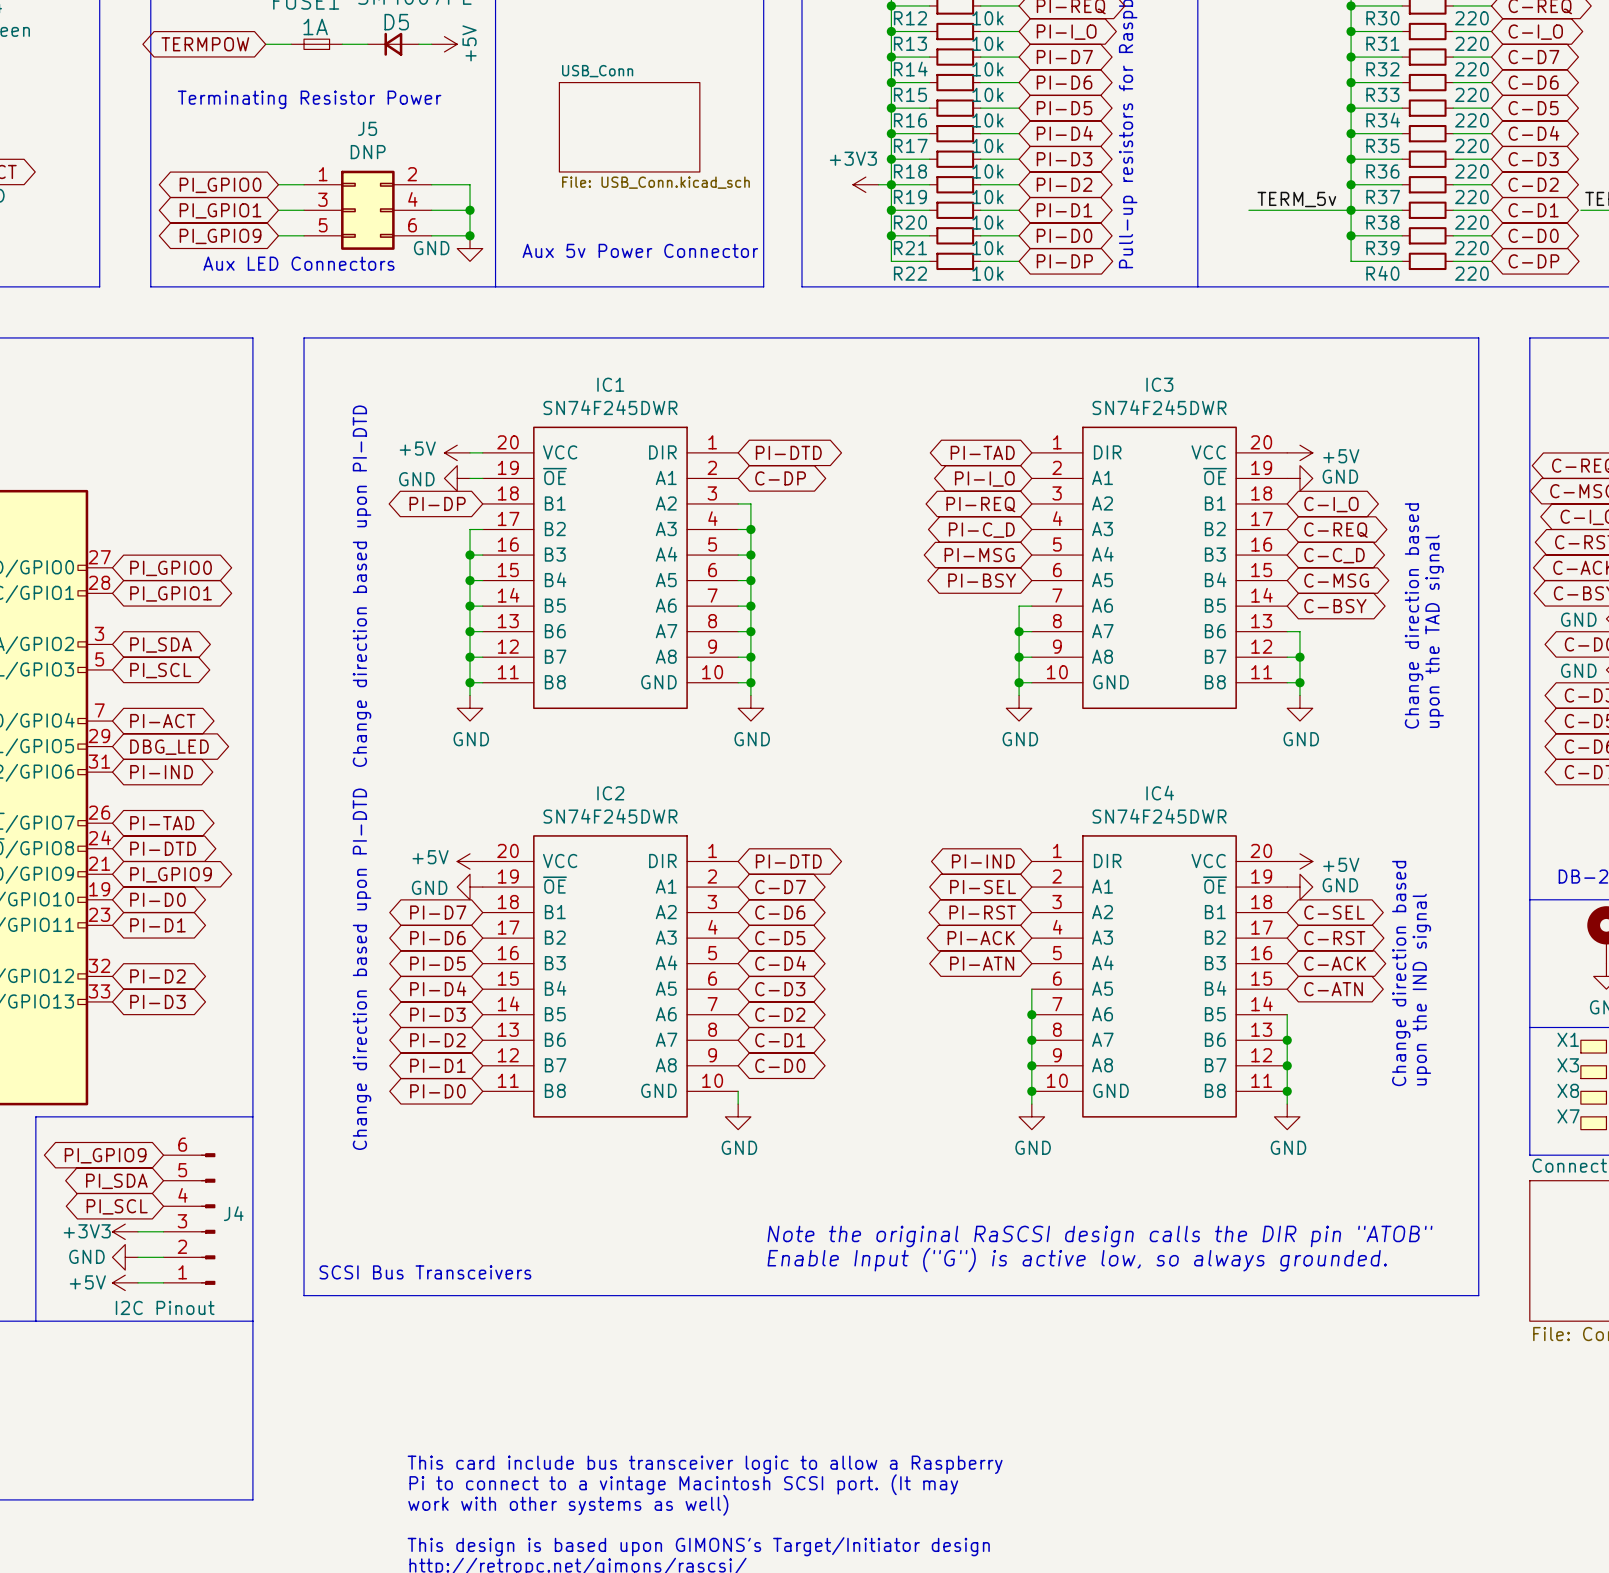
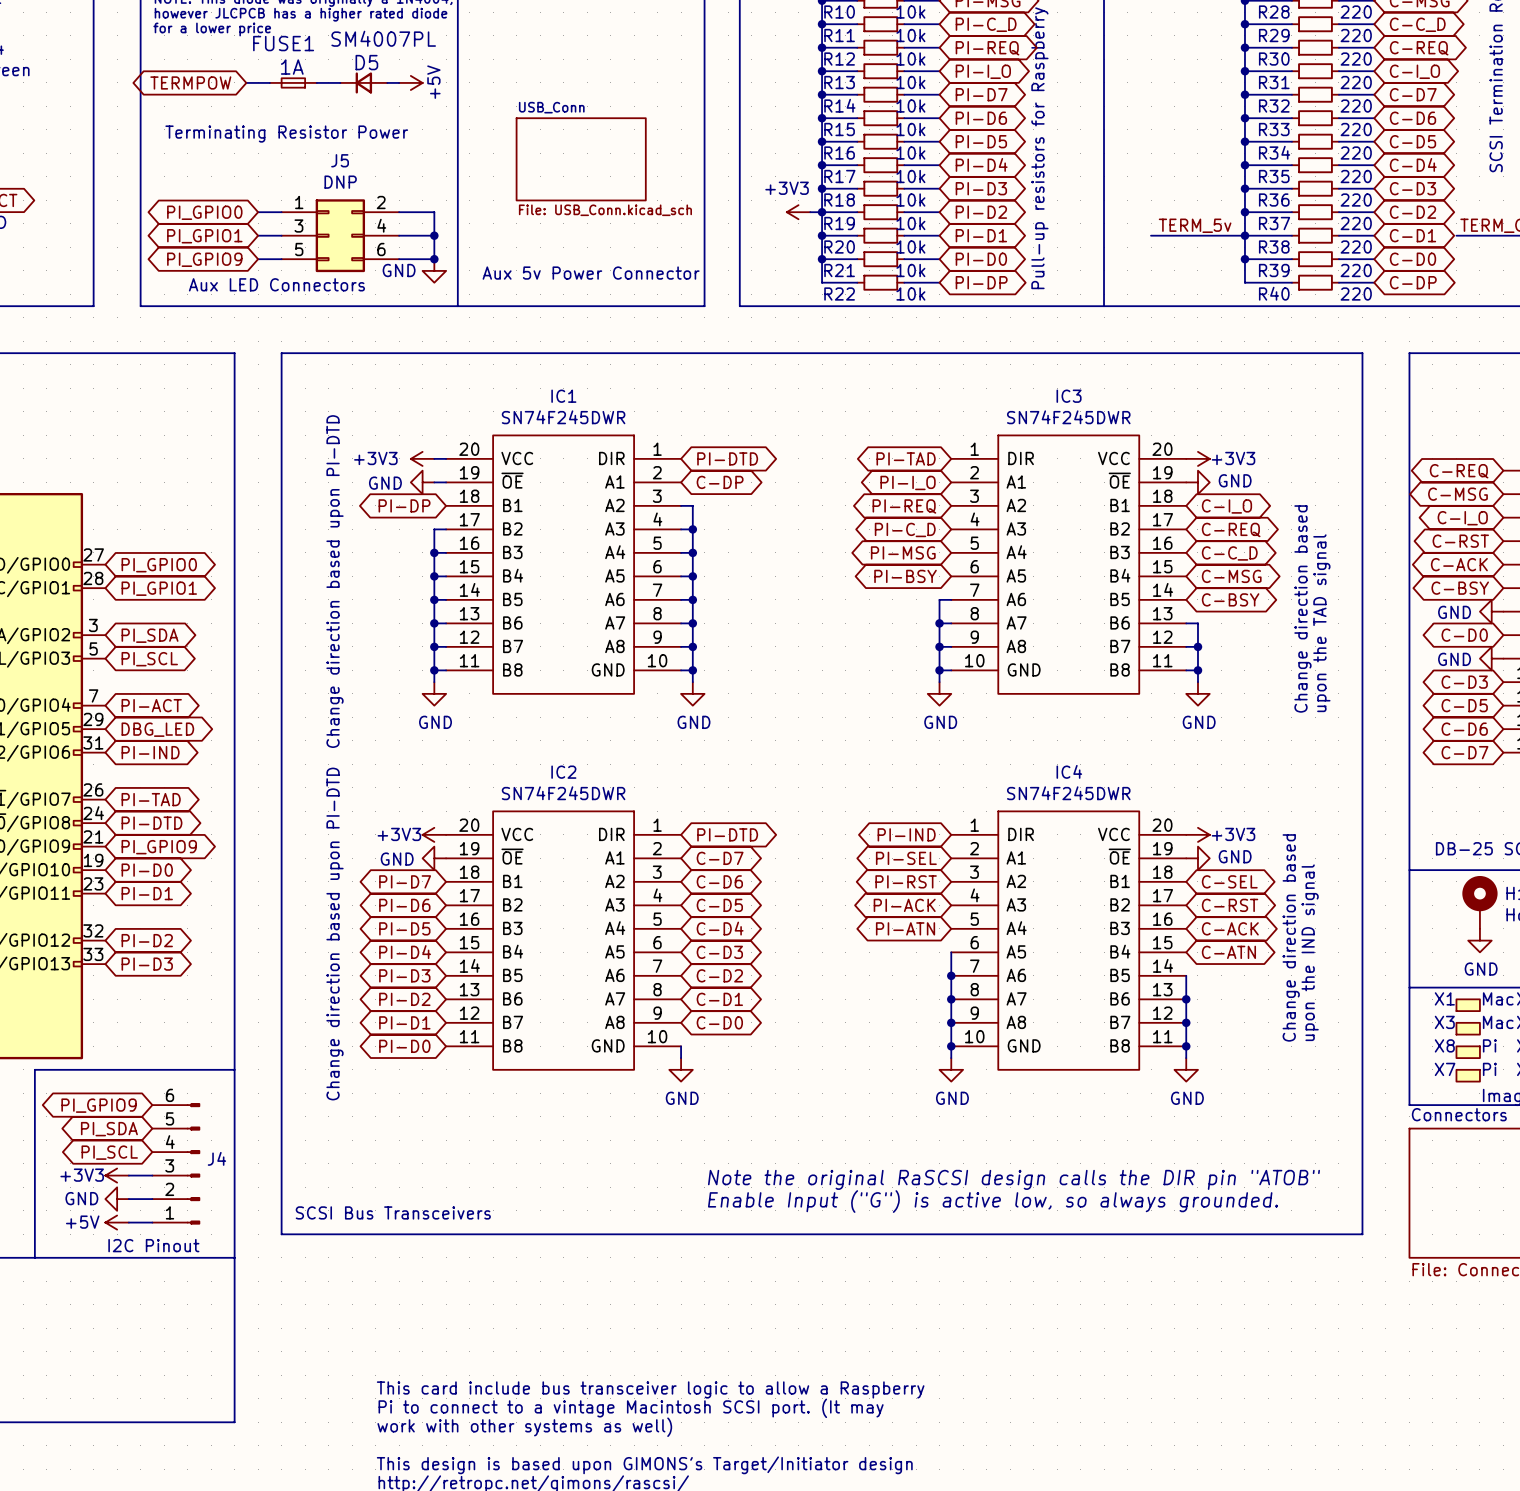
power symbol: +5V (457, 452) -> +3V3 (422, 458)
power symbol: +5V (1299, 452) -> +3V3 (1197, 458)
power symbol: +5V (470, 861) -> +3V3 (434, 834)
power symbol: +5V (1299, 861) -> +3V3 (1197, 834)

